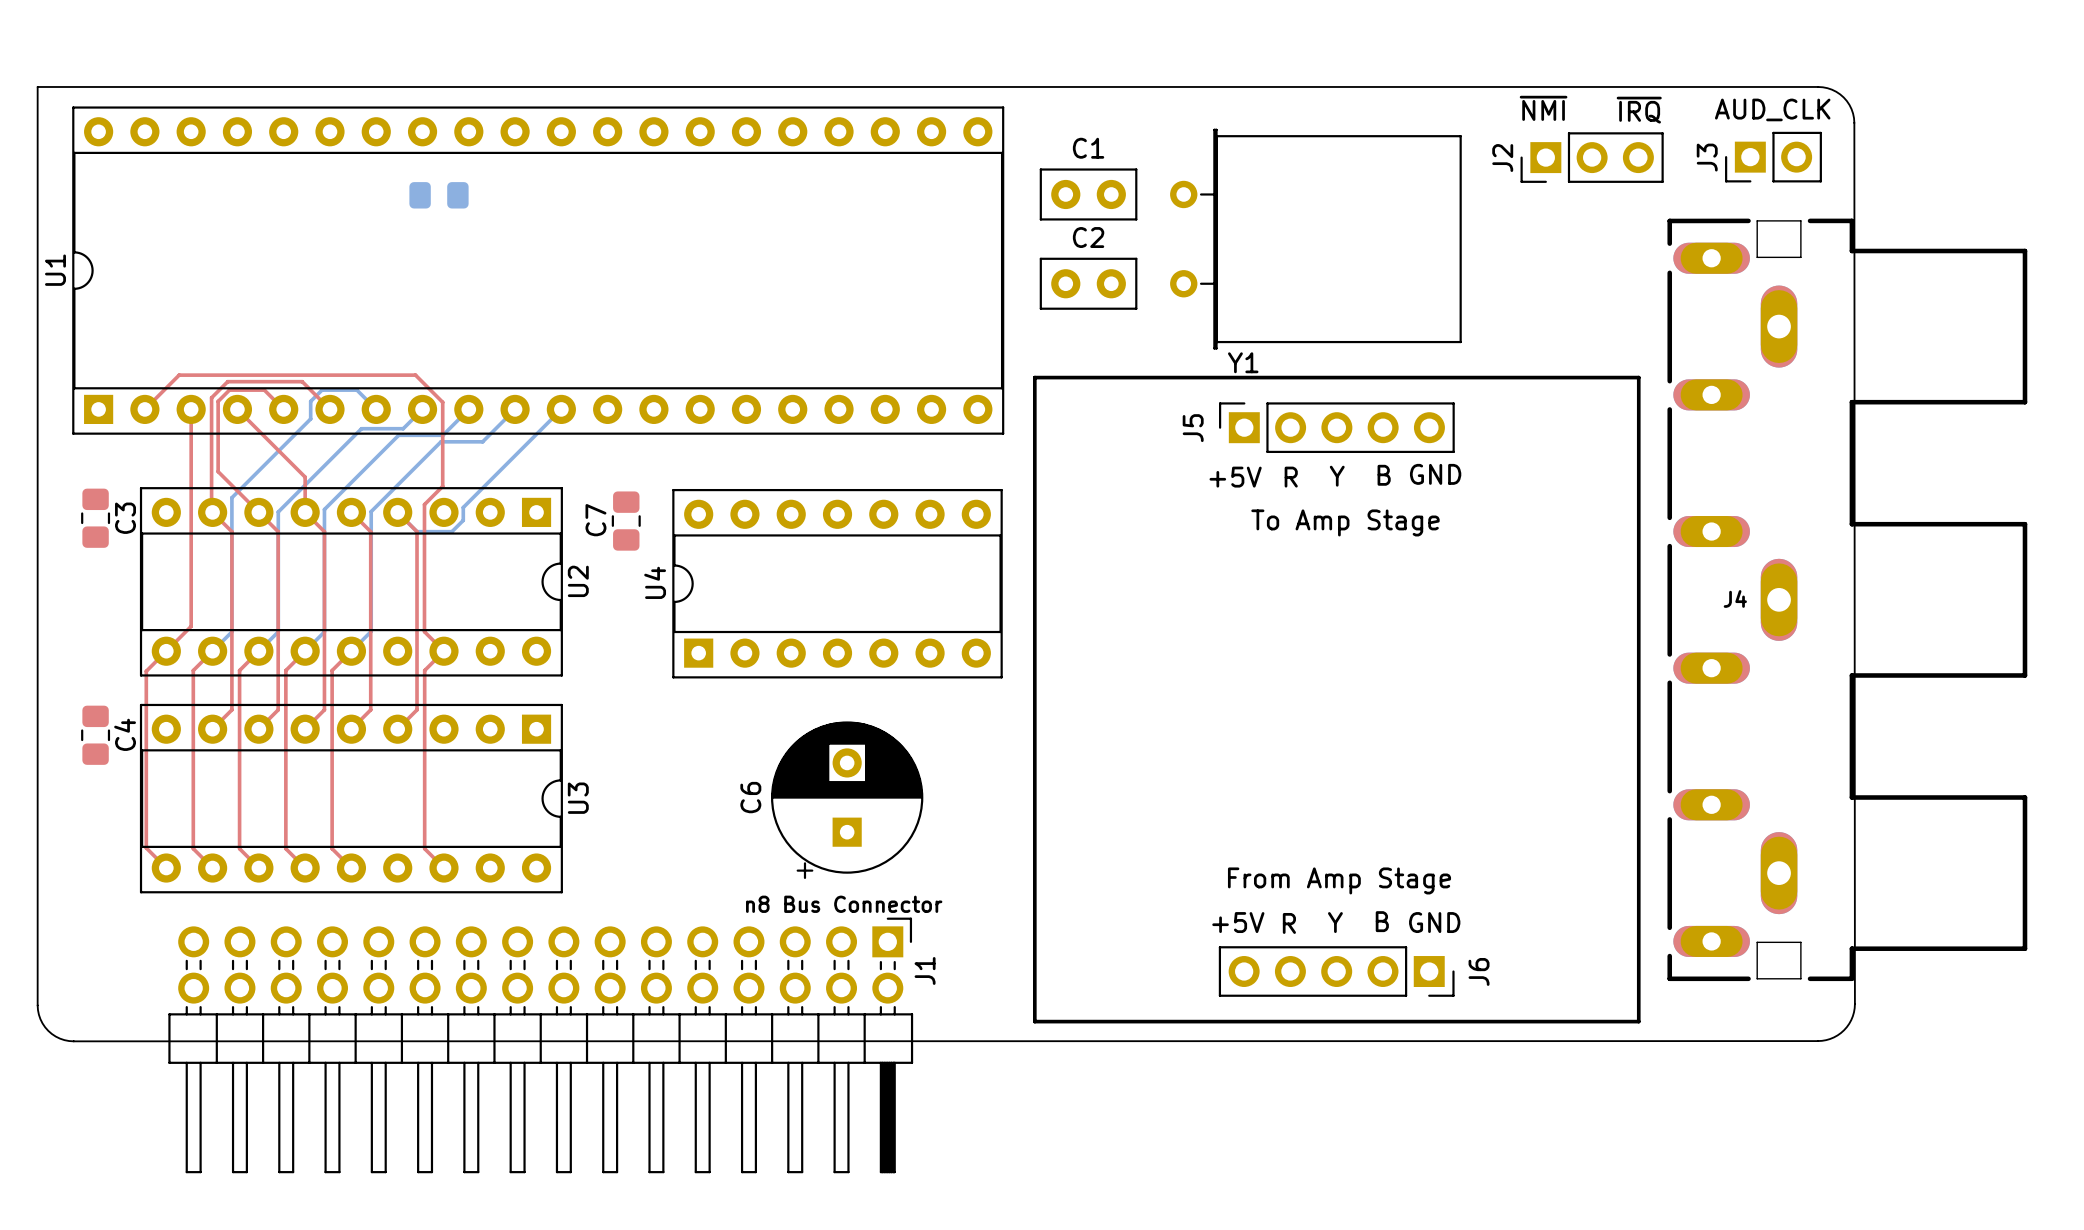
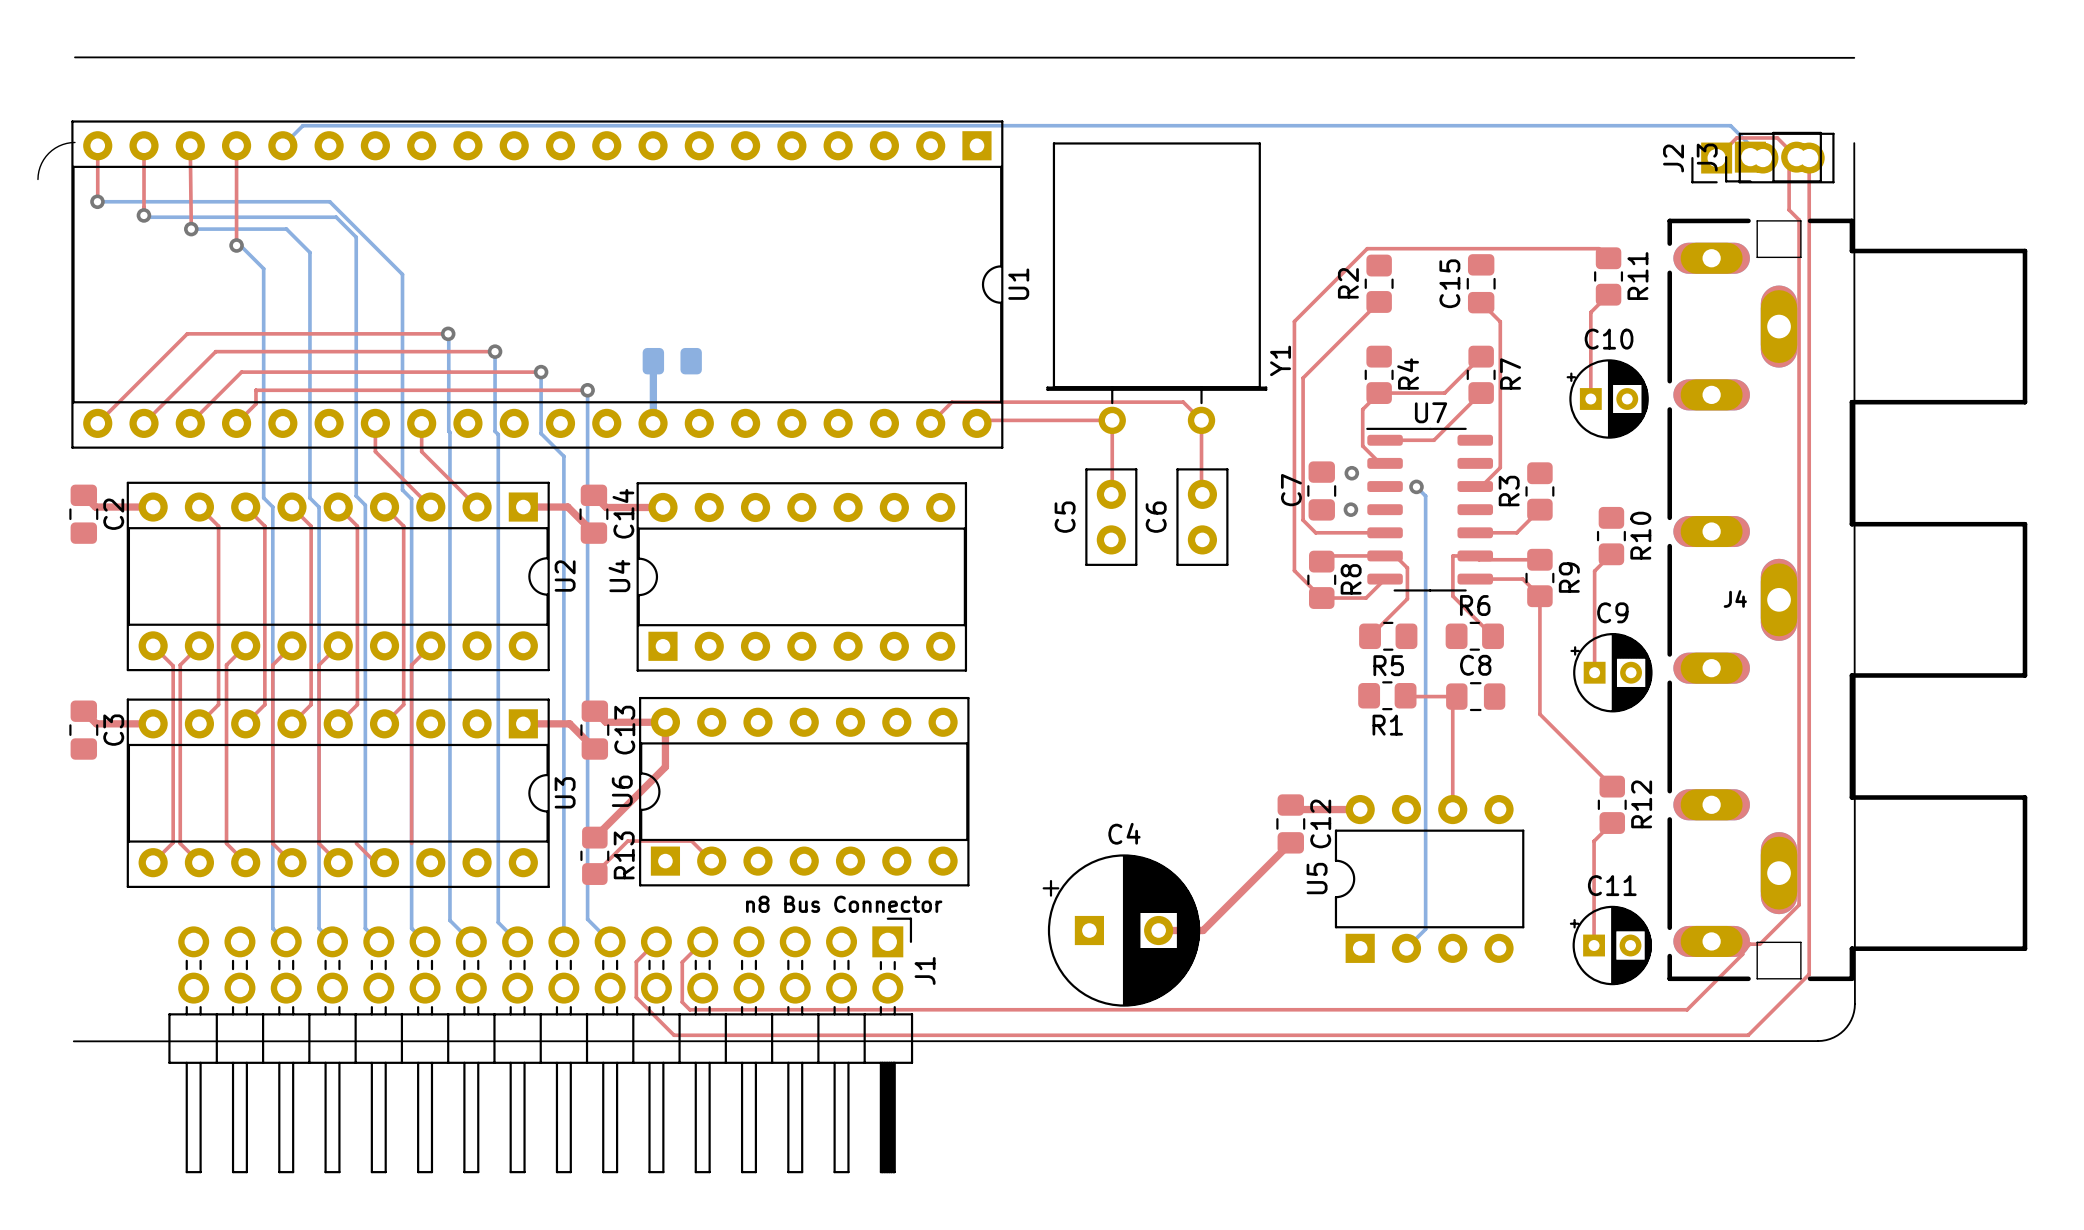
board edge: none -> (74, 57) (1854, 57)
text: ~{NMI} (1543, 108) -> none
text: AUD_CLK (1772, 109) -> none
text: ~{IRQ} (1639, 110) -> none
board edge: none -> (74, 142) (58, 146) (48, 153) (40, 167) (37, 179)
top track: none -> (97, 145) (97, 201)
top track: none -> (144, 145) (143, 215)
top track: none -> (190, 145) (191, 229)
top track: none -> (236, 145) (236, 245)
bottom track: none -> (282, 145) (302, 125) (1730, 125) (1762, 158)
J2 position: (1592, 157) -> (1762, 158)
top track: none -> (1716, 158) (1736, 137) (1777, 137) (1789, 149) (1789, 209) (1799, 219) (1799, 905) (1759, 944) (1749, 944) (1742, 951) (1742, 954) (1687, 1009) (689, 1009) (682, 1002) (682, 962) (702, 941)
top track: none -> (1809, 158) (1809, 974) (1748, 1035) (674, 1035) (636, 997) (636, 961) (656, 941)
C1: (1088, 194) -> none
part position: (439, 195) -> (672, 361)
bottom track: none -> (97, 201) (329, 201) (402, 274) (402, 489) (411, 499) (411, 928) (425, 941)
via: none -> (97, 201)
bottom track: none -> (143, 215) (145, 217) (336, 217) (356, 237) (356, 496) (365, 505) (365, 928) (378, 941)
via: none -> (143, 215)
bottom track: none -> (191, 229) (286, 229) (309, 252) (309, 498) (319, 507) (319, 928) (332, 941)
via: none -> (191, 229)
C2 name position: C2 (1088, 237) -> C2 (113, 514)
Y1 rotation: 0° (1315, 239) -> 90° counterclockwise (1156, 288)
bottom track: none -> (236, 245) (240, 245) (263, 268) (263, 497) (272, 507) (272, 928) (286, 941)
via: none -> (236, 245)
C2 footprint: [1039, 257, 1138, 310] -> [69, 484, 99, 544]
top track: none -> (1608, 258) (1598, 248) (1367, 248) (1294, 321) (1294, 570) (1321, 598) (1366, 598) (1385, 579)
U1 rotation: 0° (538, 270) -> 180° (537, 284)
R11: none -> (1608, 276)
R2: none -> (1379, 283)
C15: none -> (1481, 283)
top track: none -> (1608, 294) (1590, 312) (1590, 399)
top track: none -> (1379, 301) (1303, 378) (1303, 520) (1315, 532) (1385, 532)
top track: none -> (1481, 302) (1500, 321) (1500, 467) (1481, 486) (1475, 486)
top track: none -> (448, 333) (187, 333) (97, 423)
bottom track: none -> (448, 333) (449, 920) (471, 941)
via: none -> (448, 333)
top track: none -> (495, 351) (215, 351) (144, 423)
bottom track: none -> (495, 351) (495, 431) (498, 434) (498, 922) (517, 941)
via: none -> (495, 351)
top track: none -> (1481, 356) (1444, 393) (1379, 393) (1362, 409) (1362, 446) (1380, 463) (1385, 463)
bottom track: none -> (653, 361) (653, 423)
top track: none -> (541, 372) (241, 372) (190, 423)
bottom track: none -> (541, 372) (541, 433) (563, 456) (563, 941)
via: none -> (541, 372)
R4: none -> (1379, 374)
R7: none -> (1481, 374)
line: (1034, 377) (1638, 377) (1638, 1021) (1034, 1021) (1034, 377) -> none
top track: none -> (587, 390) (256, 390) (255, 404) (236, 423)
bottom track: none -> (587, 390) (587, 919) (610, 941)
via: none -> (587, 390)
top track: none -> (1481, 393) (1433, 440) (1385, 440)
C10: none -> (1607, 399)
top track: (144, 409) (179, 375) (415, 375) (442, 402) (442, 486) (424, 504) (424, 631) (443, 651) (424, 670) (424, 848) (443, 868) -> none
top track: (191, 409) (191, 626) (146, 671) (146, 847) (166, 868) -> none
top track: (237, 409) (305, 477) (305, 512) (324, 531) (324, 709) (305, 729) -> none
top track: (283, 409) (264, 390) (229, 390) (218, 401) (218, 471) (278, 531) (278, 709) (258, 729) -> none
top track: (329, 409) (302, 381) (227, 381) (211, 397) (211, 511) (231, 531) (231, 709) (212, 729) -> none
bottom track: (376, 409) (356, 390) (321, 390) (310, 401) (310, 418) (231, 497) (231, 631) (212, 651) -> none
bottom track: (422, 409) (403, 428) (361, 428) (278, 511) (278, 631) (258, 651) -> none
bottom track: (468, 409) (442, 435) (398, 435) (324, 509) (324, 631) (305, 651) -> none
bottom track: (515, 409) (482, 441) (440, 441) (371, 511) (371, 631) (351, 651) -> none
bottom track: (561, 409) (463, 507) (463, 520) (451, 531) (417, 531) (397, 512) -> none
top track: none -> (375, 423) (375, 451) (430, 507)
top track: none -> (421, 423) (421, 451) (477, 507)
top track: none -> (930, 423) (951, 402) (1183, 402) (1201, 420) (1202, 494)
top track: none -> (976, 423) (979, 420) (1112, 420) (1111, 494)
J5: (1336, 427) -> none
via: none -> (1351, 473)
text: GND (1435, 474) -> none
text: B (1384, 475) -> none
text: Y (1337, 476) -> none
text: +5V (1235, 477) -> none
text: R (1291, 477) -> none
bottom track: none -> (1416, 486) (1425, 496) (1425, 929) (1406, 948)
via: none -> (1416, 486)
R3: none -> (1539, 491)
top track: none -> (83, 495) (95, 507) (153, 507)
top track: none -> (593, 495) (606, 507) (662, 507)
top track: none -> (199, 507) (218, 526) (218, 704) (199, 723)
top track: none -> (245, 507) (264, 526) (264, 704) (245, 723)
top track: none -> (291, 507) (311, 526) (311, 704) (291, 723)
top track: none -> (523, 507) (567, 507) (593, 533)
via: none -> (1350, 509)
U7: none -> (1429, 509)
top track: none -> (1539, 509) (1516, 532) (1475, 532)
top track: (351, 512) (370, 531) (370, 709) (351, 729) -> (338, 507) (357, 526) (357, 704) (338, 723)
top track: (397, 512) (417, 531) (417, 709) (397, 729) -> (384, 507) (403, 526) (403, 704) (384, 723)
C14: none -> (593, 514)
C5: none -> (1111, 517)
C3 position: (95, 518) -> (83, 730)
C7 position: (626, 521) -> (1321, 490)
text: To Amp Stage (1345, 522) -> none
R10: none -> (1611, 536)
top track: none -> (1611, 554) (1594, 571) (1594, 672)
top track: none -> (1453, 555) (1475, 555) (1479, 559) (1539, 559)
top track: none -> (1452, 556) (1452, 596) (1493, 636)
top track: none -> (1321, 561) (1327, 555) (1395, 555) (1407, 568) (1407, 598) (1370, 636)
R9: none -> (1539, 577)
R8: none -> (1321, 579)
top track: none -> (1475, 579) (1522, 579) (1539, 596) (1539, 714) (1612, 786)
U2 position: (351, 581) -> (338, 576)
U4 position: (837, 583) -> (801, 576)
R5: none -> (1388, 636)
R6: none -> (1474, 636)
top track: none -> (153, 645) (173, 665) (173, 842) (153, 862)
top track: none -> (430, 645) (411, 665) (411, 843)
top track: (212, 651) (193, 670) (193, 848) (212, 868) -> (199, 645) (180, 665) (180, 843) (199, 862)
top track: (258, 651) (239, 670) (239, 848) (258, 868) -> (245, 645) (226, 665) (226, 843) (245, 862)
top track: (305, 651) (285, 670) (285, 848) (305, 868) -> (291, 645) (272, 665) (272, 843) (291, 862)
top track: (351, 651) (332, 670) (332, 848) (351, 868) -> (338, 645) (319, 665) (319, 843) (338, 862)
C9: none -> (1611, 672)
R1: none -> (1387, 695)
top track: none -> (1405, 695) (1456, 696) (1452, 700) (1452, 809)
C8: none -> (1475, 696)
C4 footprint: [81, 705, 111, 765] -> [1042, 854, 1201, 1007]
top track: none -> (83, 711) (96, 723) (153, 723)
top track: none -> (594, 711) (605, 722) (665, 722) (665, 767) (594, 837)
C6 footprint: [771, 721, 924, 880] -> [1176, 468, 1229, 566]
top track: none -> (523, 723) (569, 723) (594, 749)
C13: none -> (594, 730)
C4 name position: C4 (125, 734) -> C4 (1124, 833)
U6: none -> (804, 791)
C6 name position: C6 (750, 797) -> C6 (1156, 517)
U3 position: (351, 798) -> (338, 793)
R12: none -> (1612, 804)
top track: none -> (1290, 805) (1295, 809) (1360, 809)
C12: none -> (1290, 823)
top track: none -> (1612, 823) (1594, 841) (1594, 945)
top track: none -> (1290, 842) (1203, 930) (1158, 930)
top track: none -> (356, 843) (375, 862)
R13: none -> (594, 855)
top track: none -> (711, 861) (691, 841) (627, 841) (594, 874)
U5: none -> (1429, 878)
text: From Amp Stage (1339, 880) -> none
text: B (1382, 921) -> none
text: +5V (1238, 922) -> none
text: Y (1335, 922) -> none
text: GND (1434, 922) -> none
text: R (1289, 923) -> none
C11: none -> (1610, 945)
J6: (1336, 971) -> none
board edge: (1854, 1004) (1854, 122) (1849, 104) (1836, 91) (1818, 86) (37, 86) (37, 1005) (40, 1019) (48, 1030) (60, 1038) (73, 1041) -> (1854, 1004) (1854, 143)

